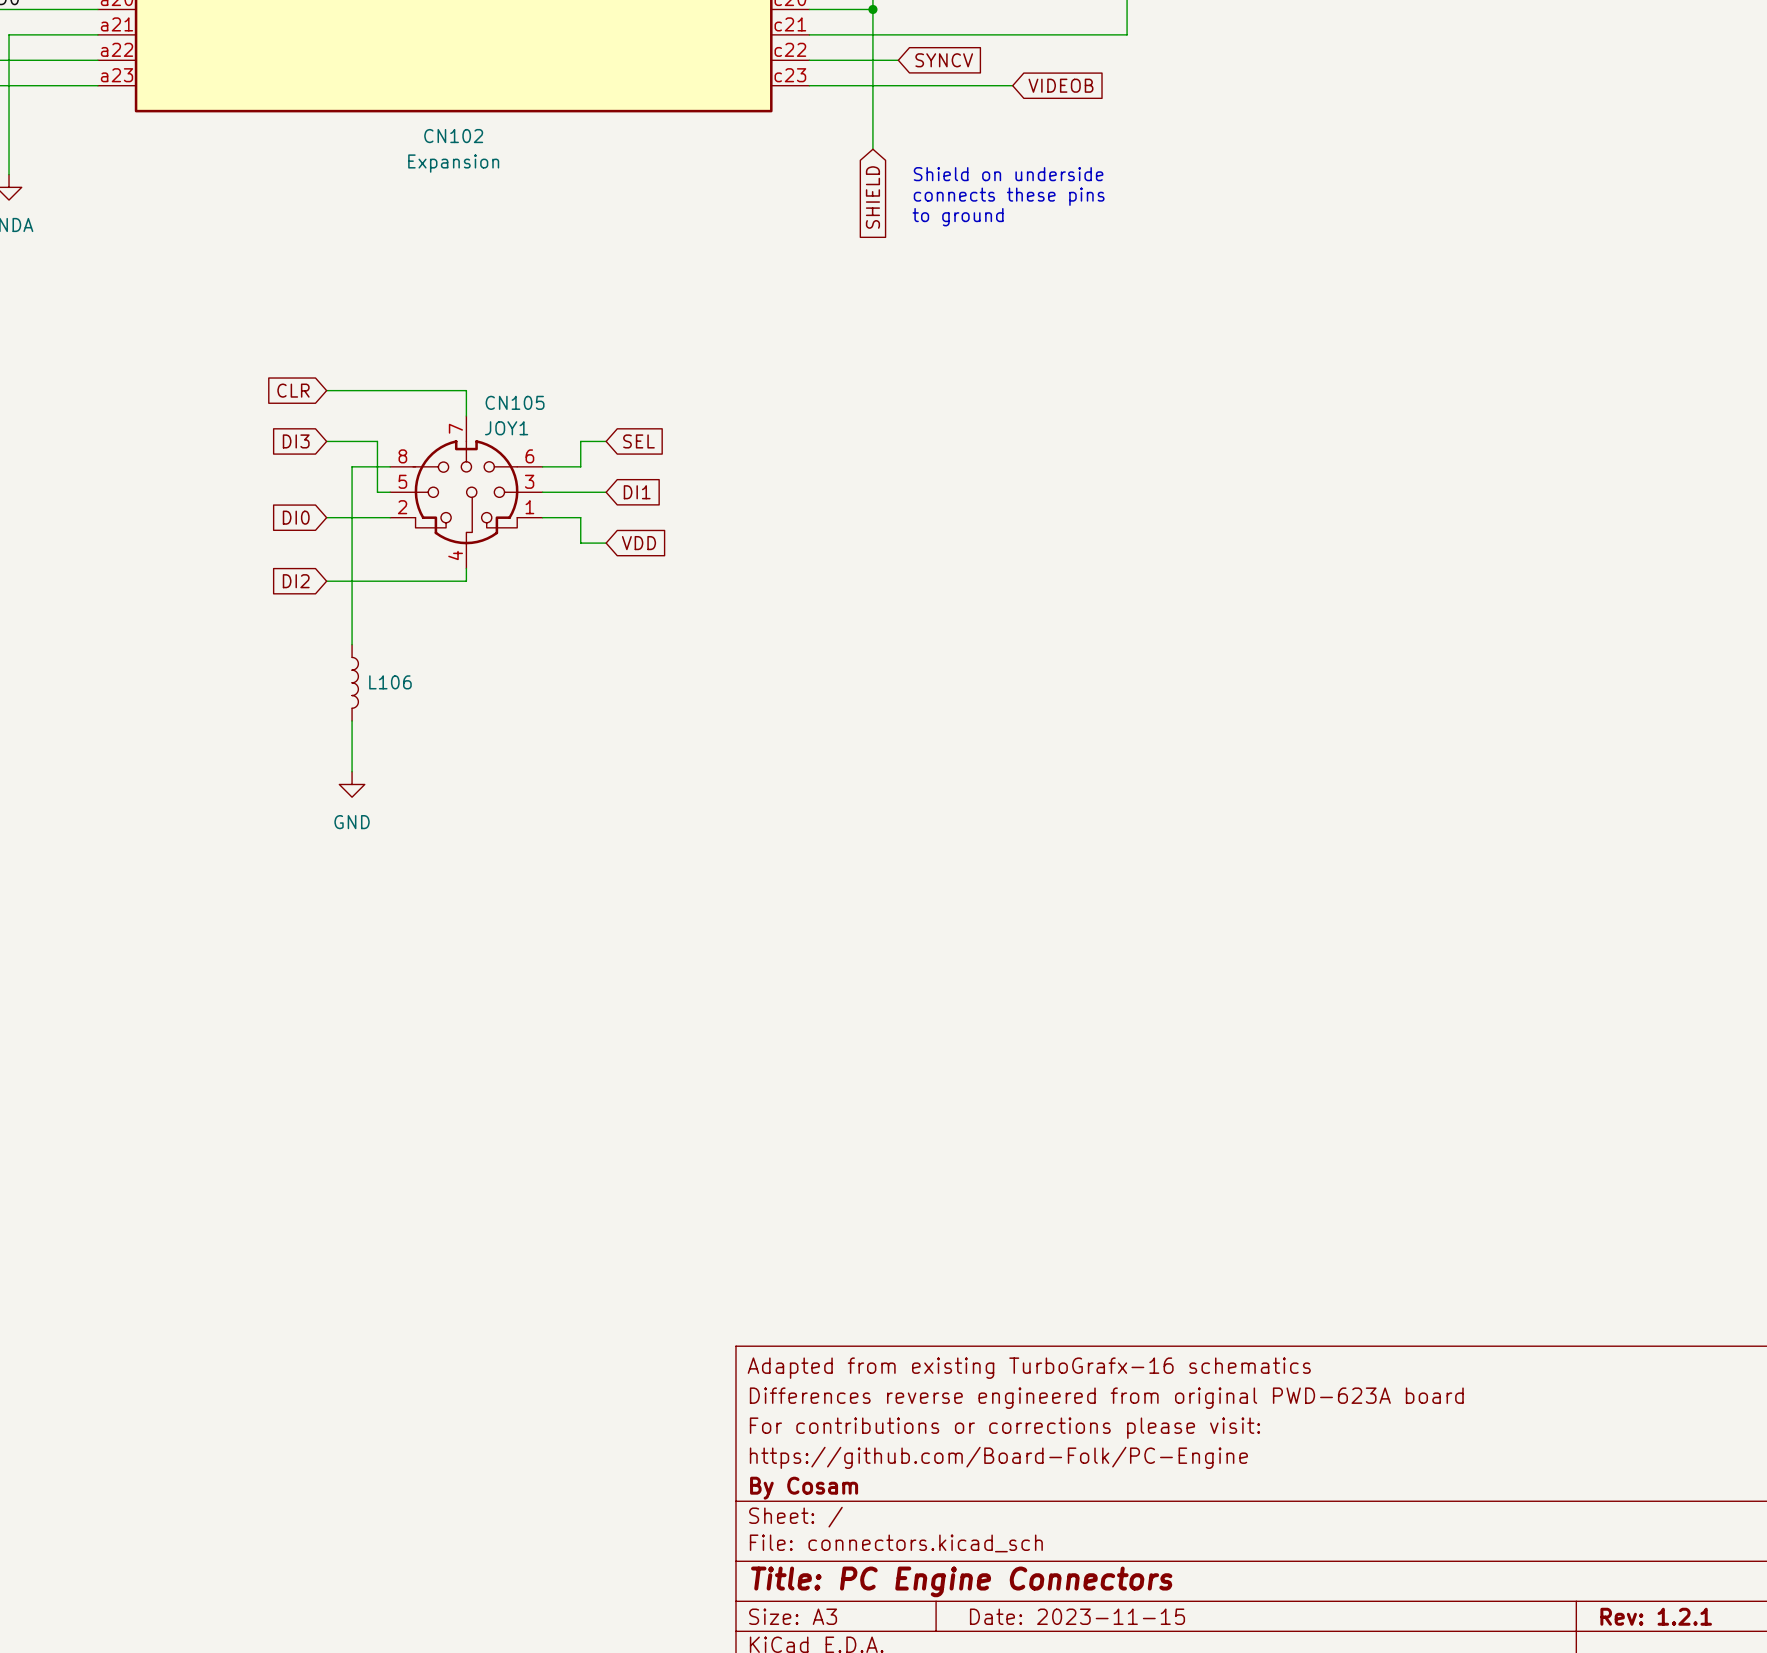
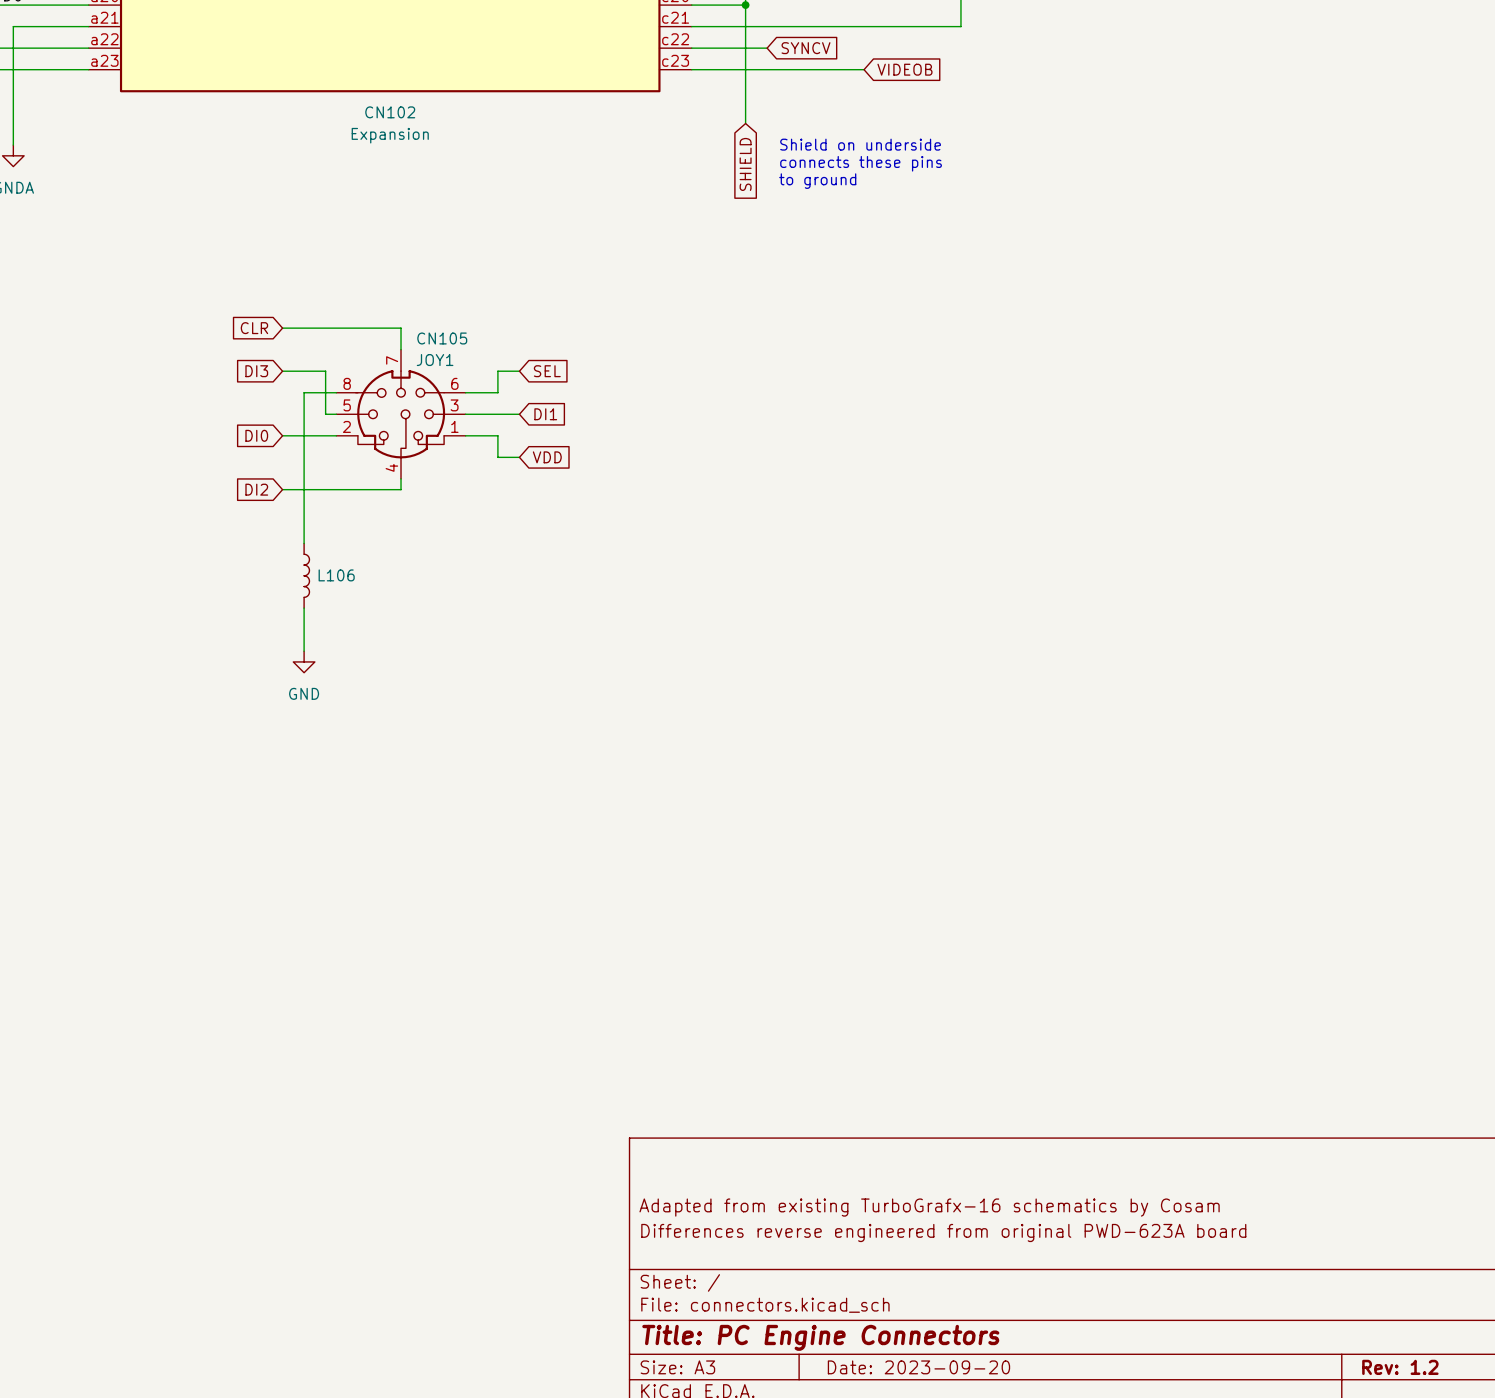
title block: Adapted from existing TurboGrafx-16 schematics (1029, 1368) -> none
title block: Differences reverse engineered from original PWD-623A board (1106, 1398) -> none
title block: For contributions or corrections please visit: (1004, 1428) -> Adapted from existing TurboGrafx-16 schematics by Cosam (929, 1207)
title block: https://github.com/Board-Folk/PC-Engine (998, 1457) -> Differences reverse engineered from original PWD-623A board (943, 1232)
title block: By Cosam (804, 1488) -> none
title block: Date: 2023-11-15 (1077, 1616) -> Date: 2023-09-20 (918, 1367)
title block: Rev: 1.2.1 (1656, 1616) -> Rev: 1.2 (1400, 1367)

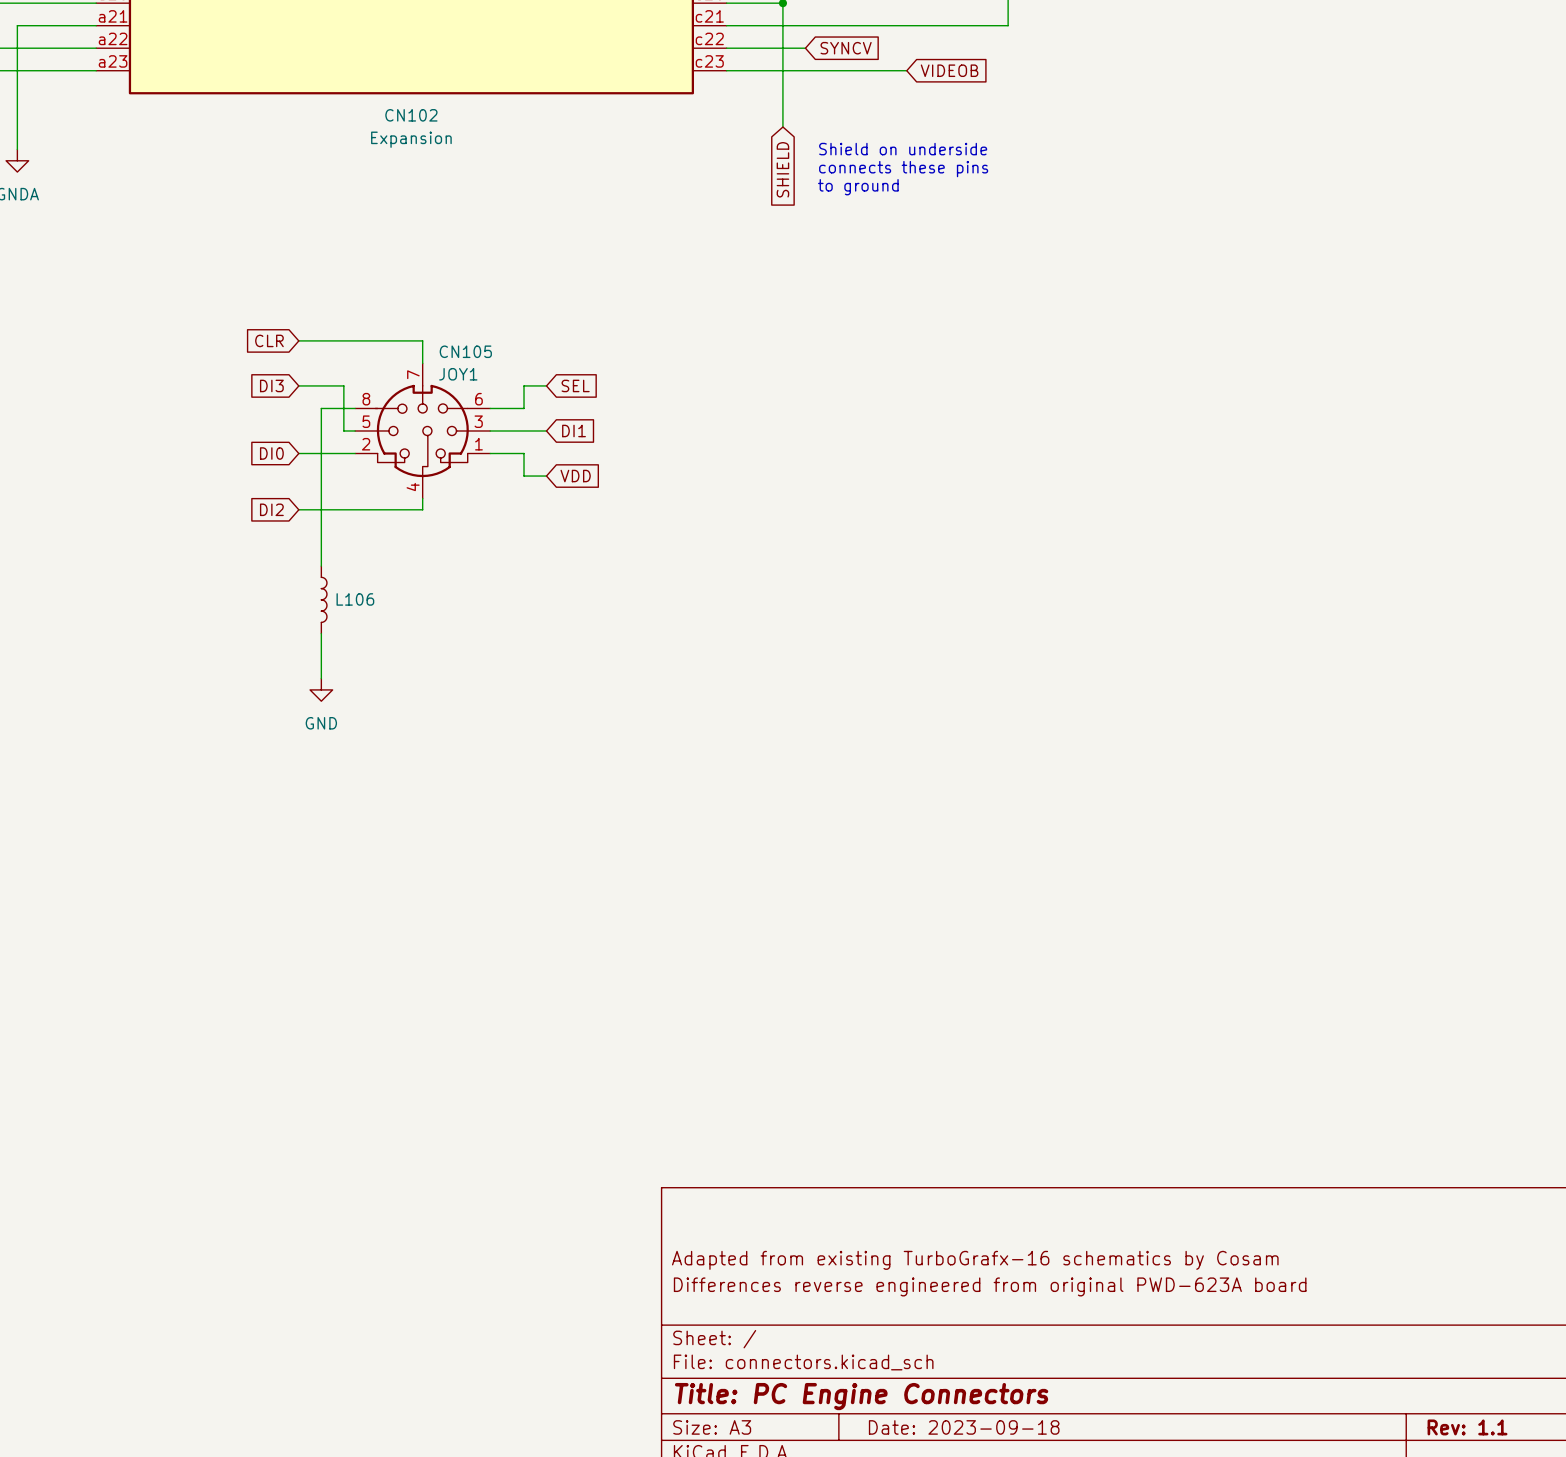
title block: Date: 2023-09-20 (918, 1367) -> Date: 2023-09-18 (964, 1427)
title block: Rev: 1.2 (1400, 1367) -> Rev: 1.1 (1467, 1427)

